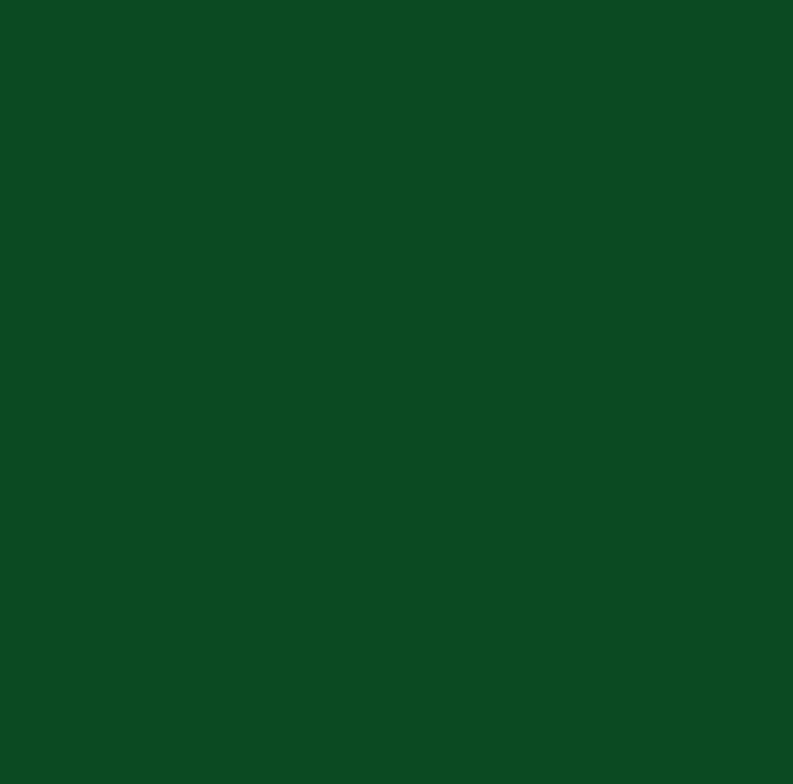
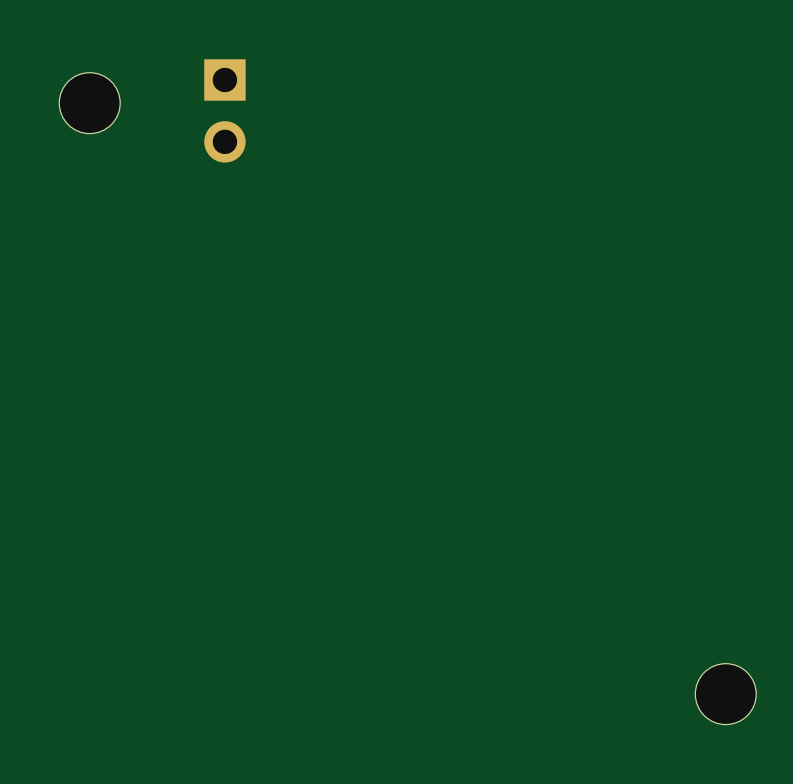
part: none -> (89, 103)
part: none -> (224, 110)
part: none -> (725, 694)

